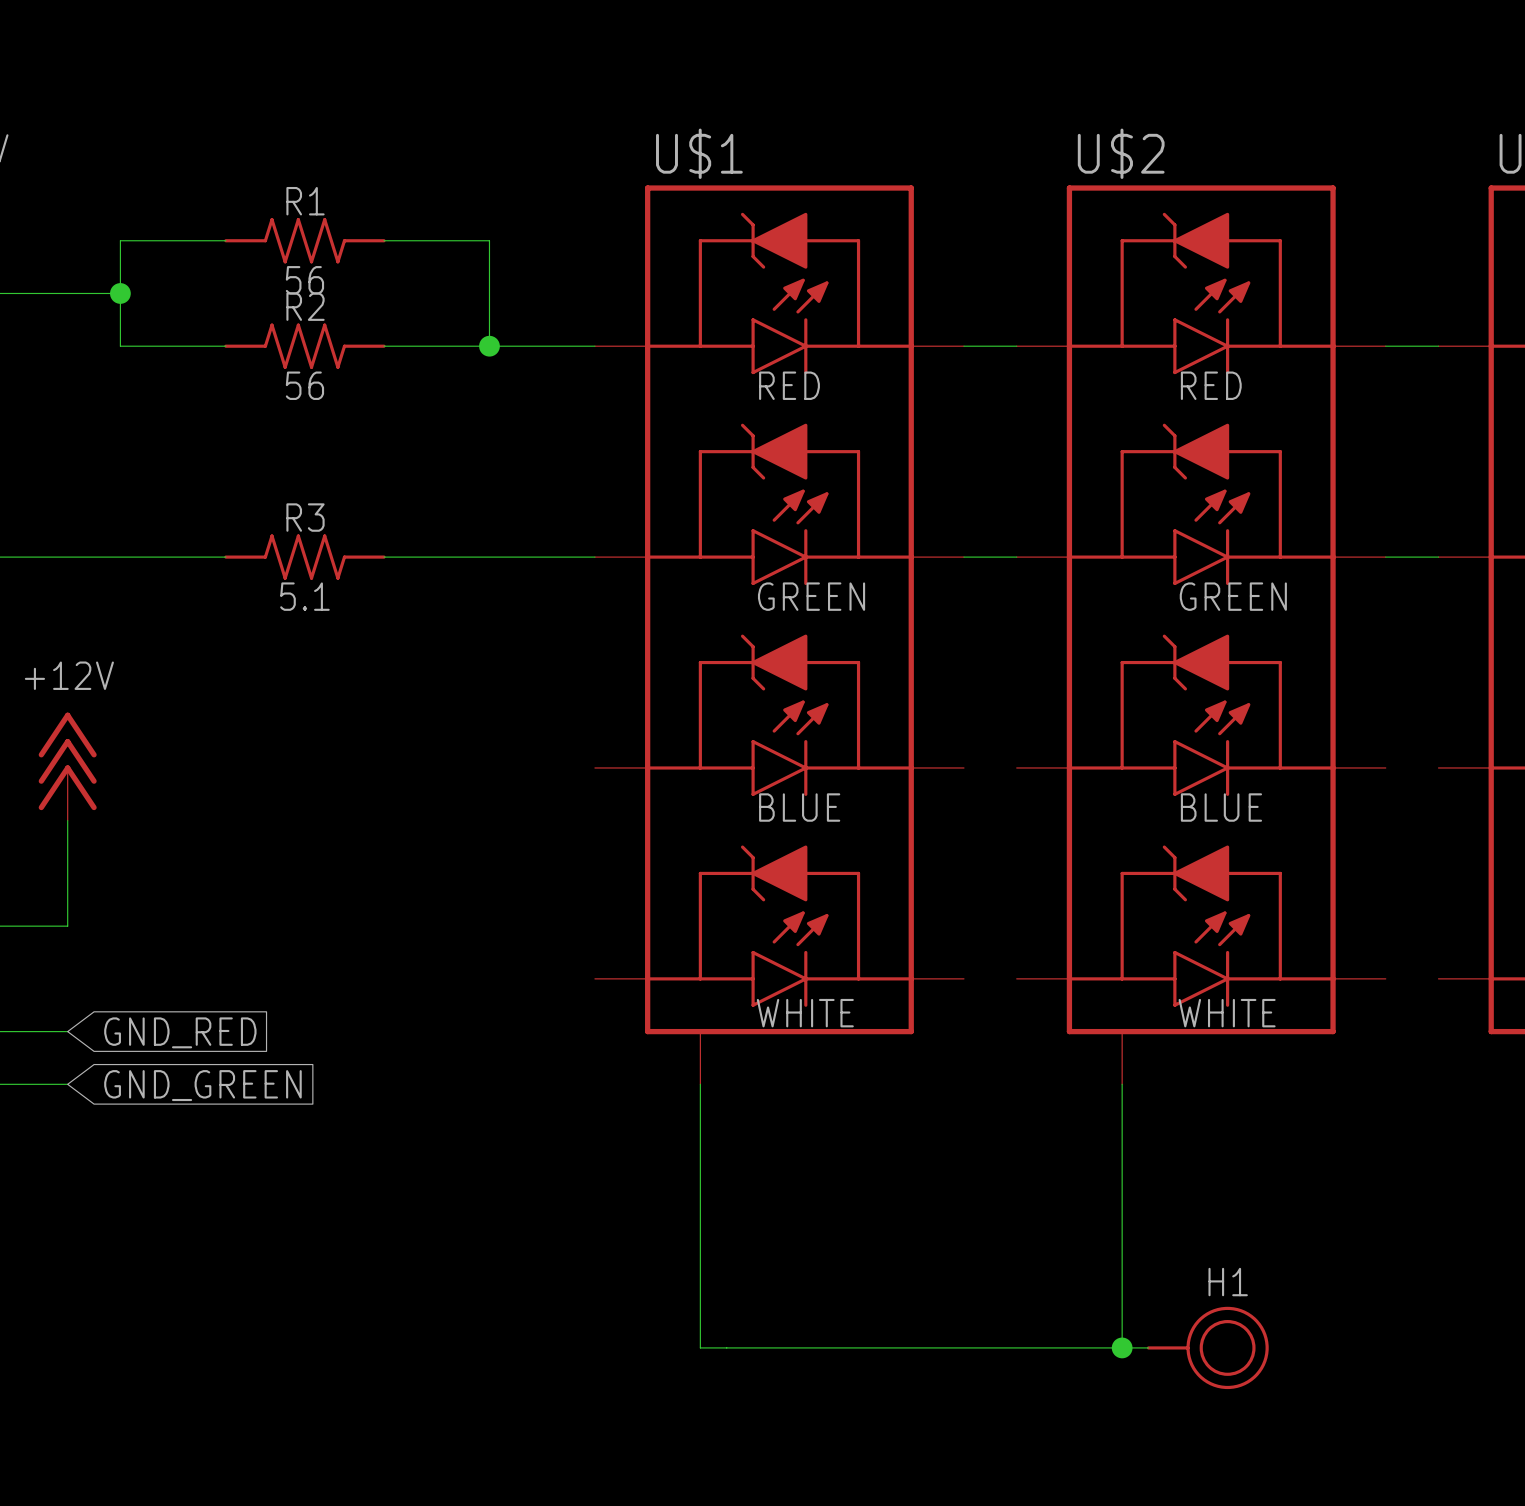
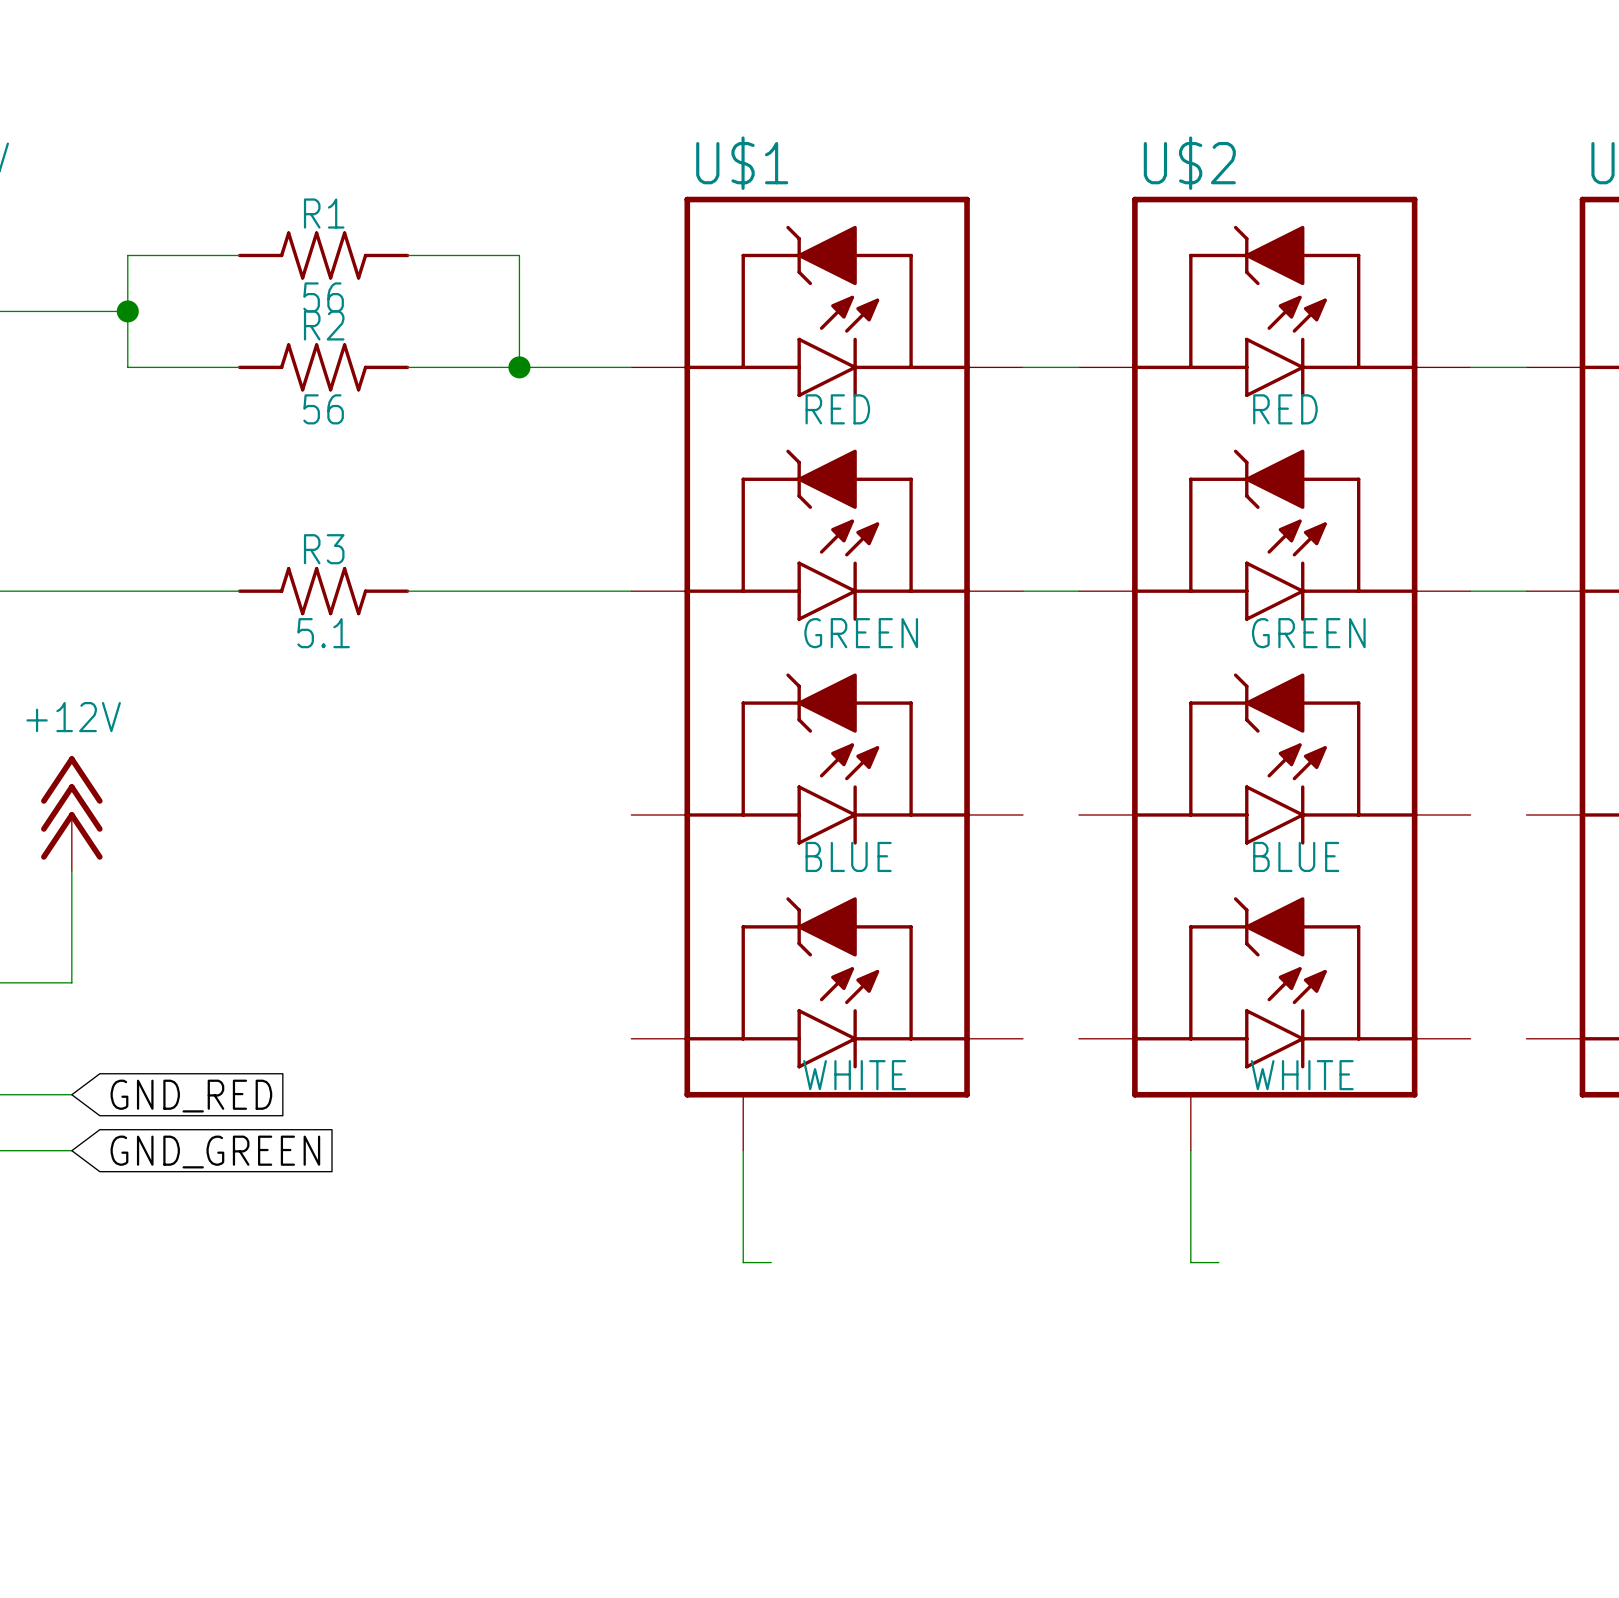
wire: (700, 1189) (700, 1347) (1148, 1347) -> (743, 1262) (771, 1262)
wire: (1122, 1189) (1122, 1347) -> (1190, 1262) (1218, 1262)
junction: (1122, 1347) -> none
H1: (1207, 1347) -> none

